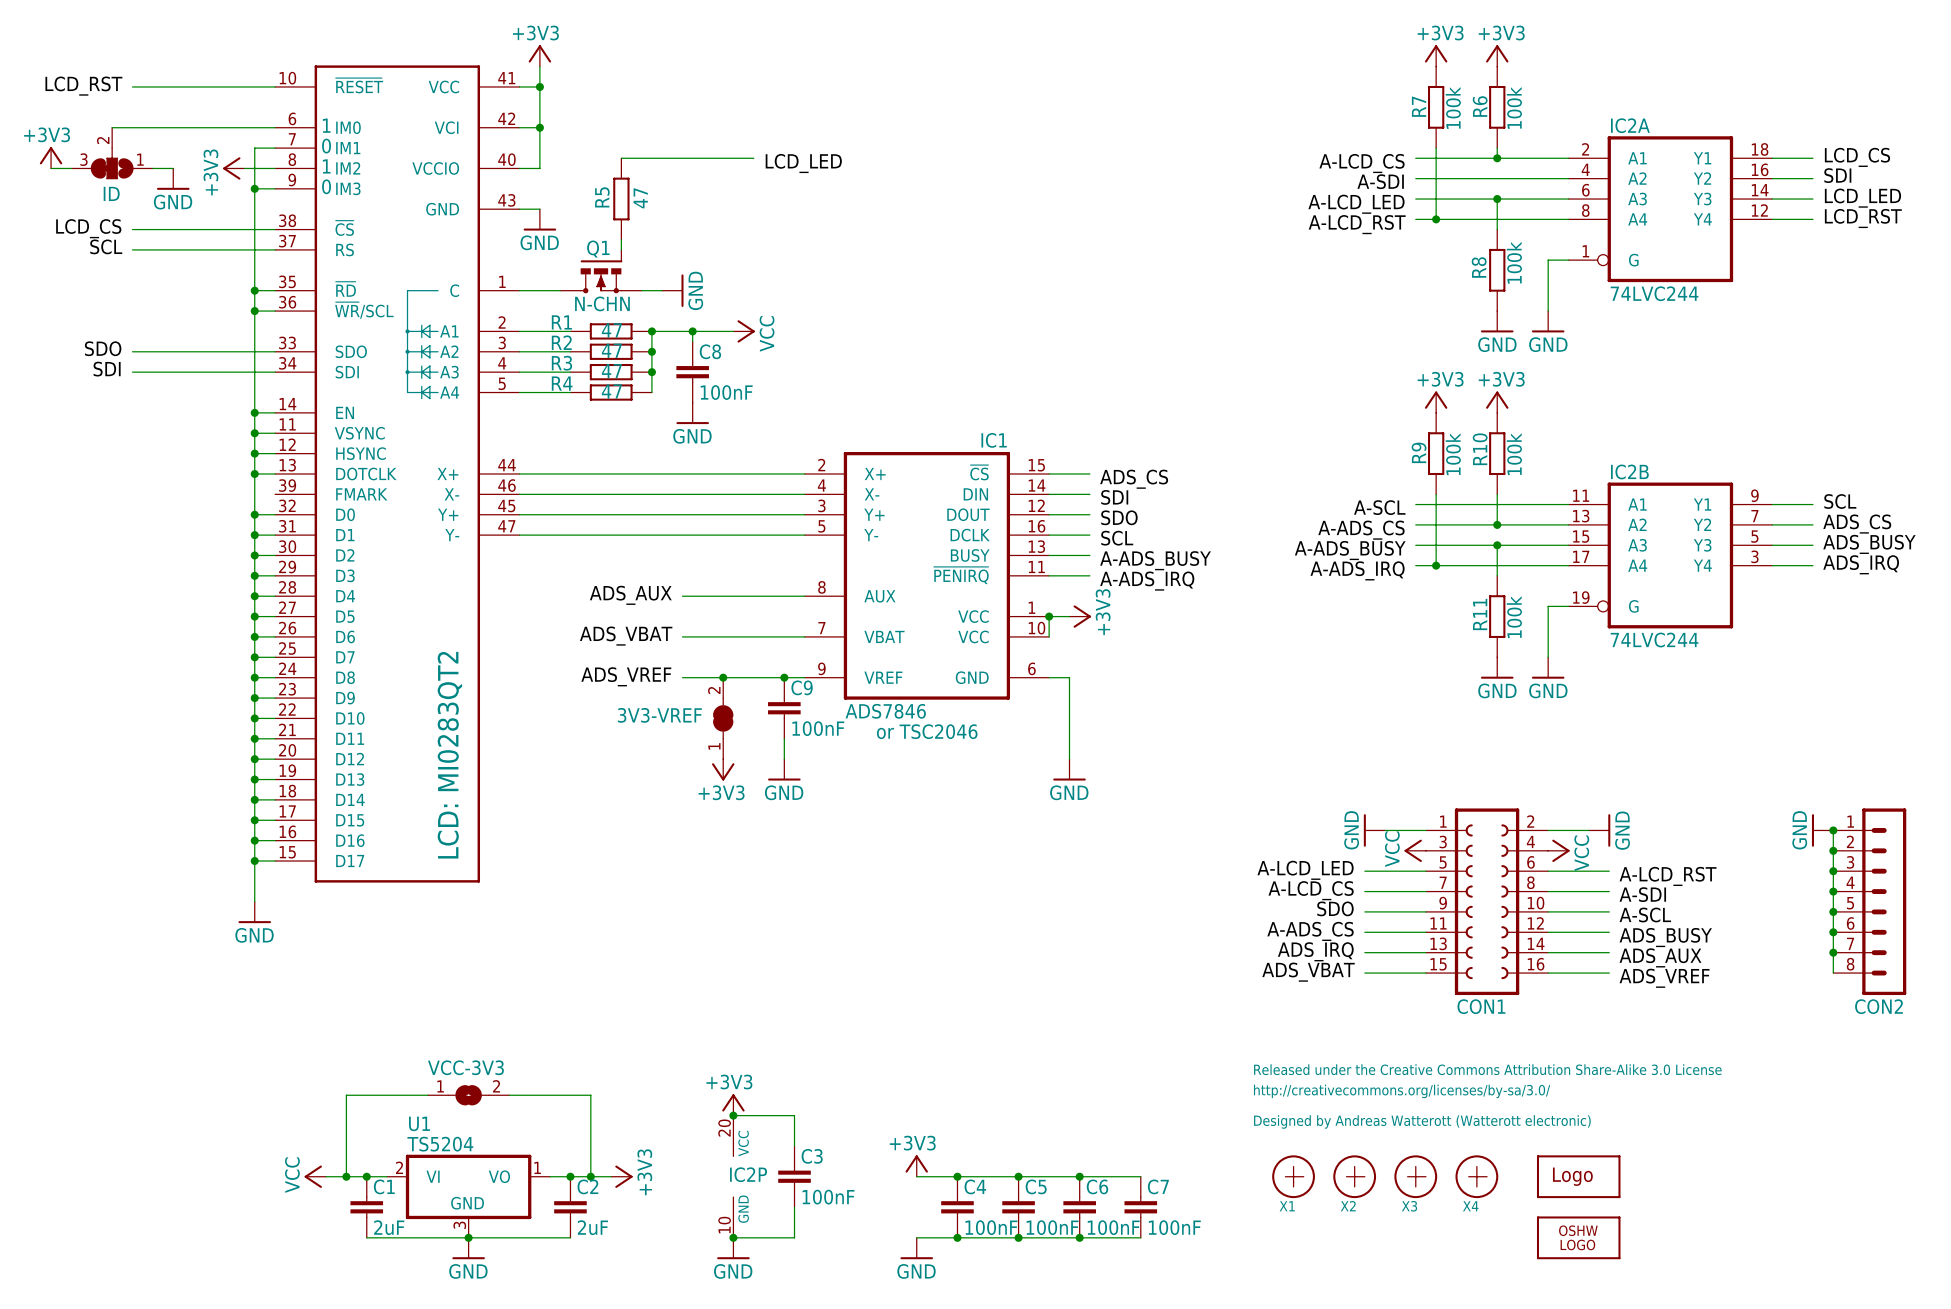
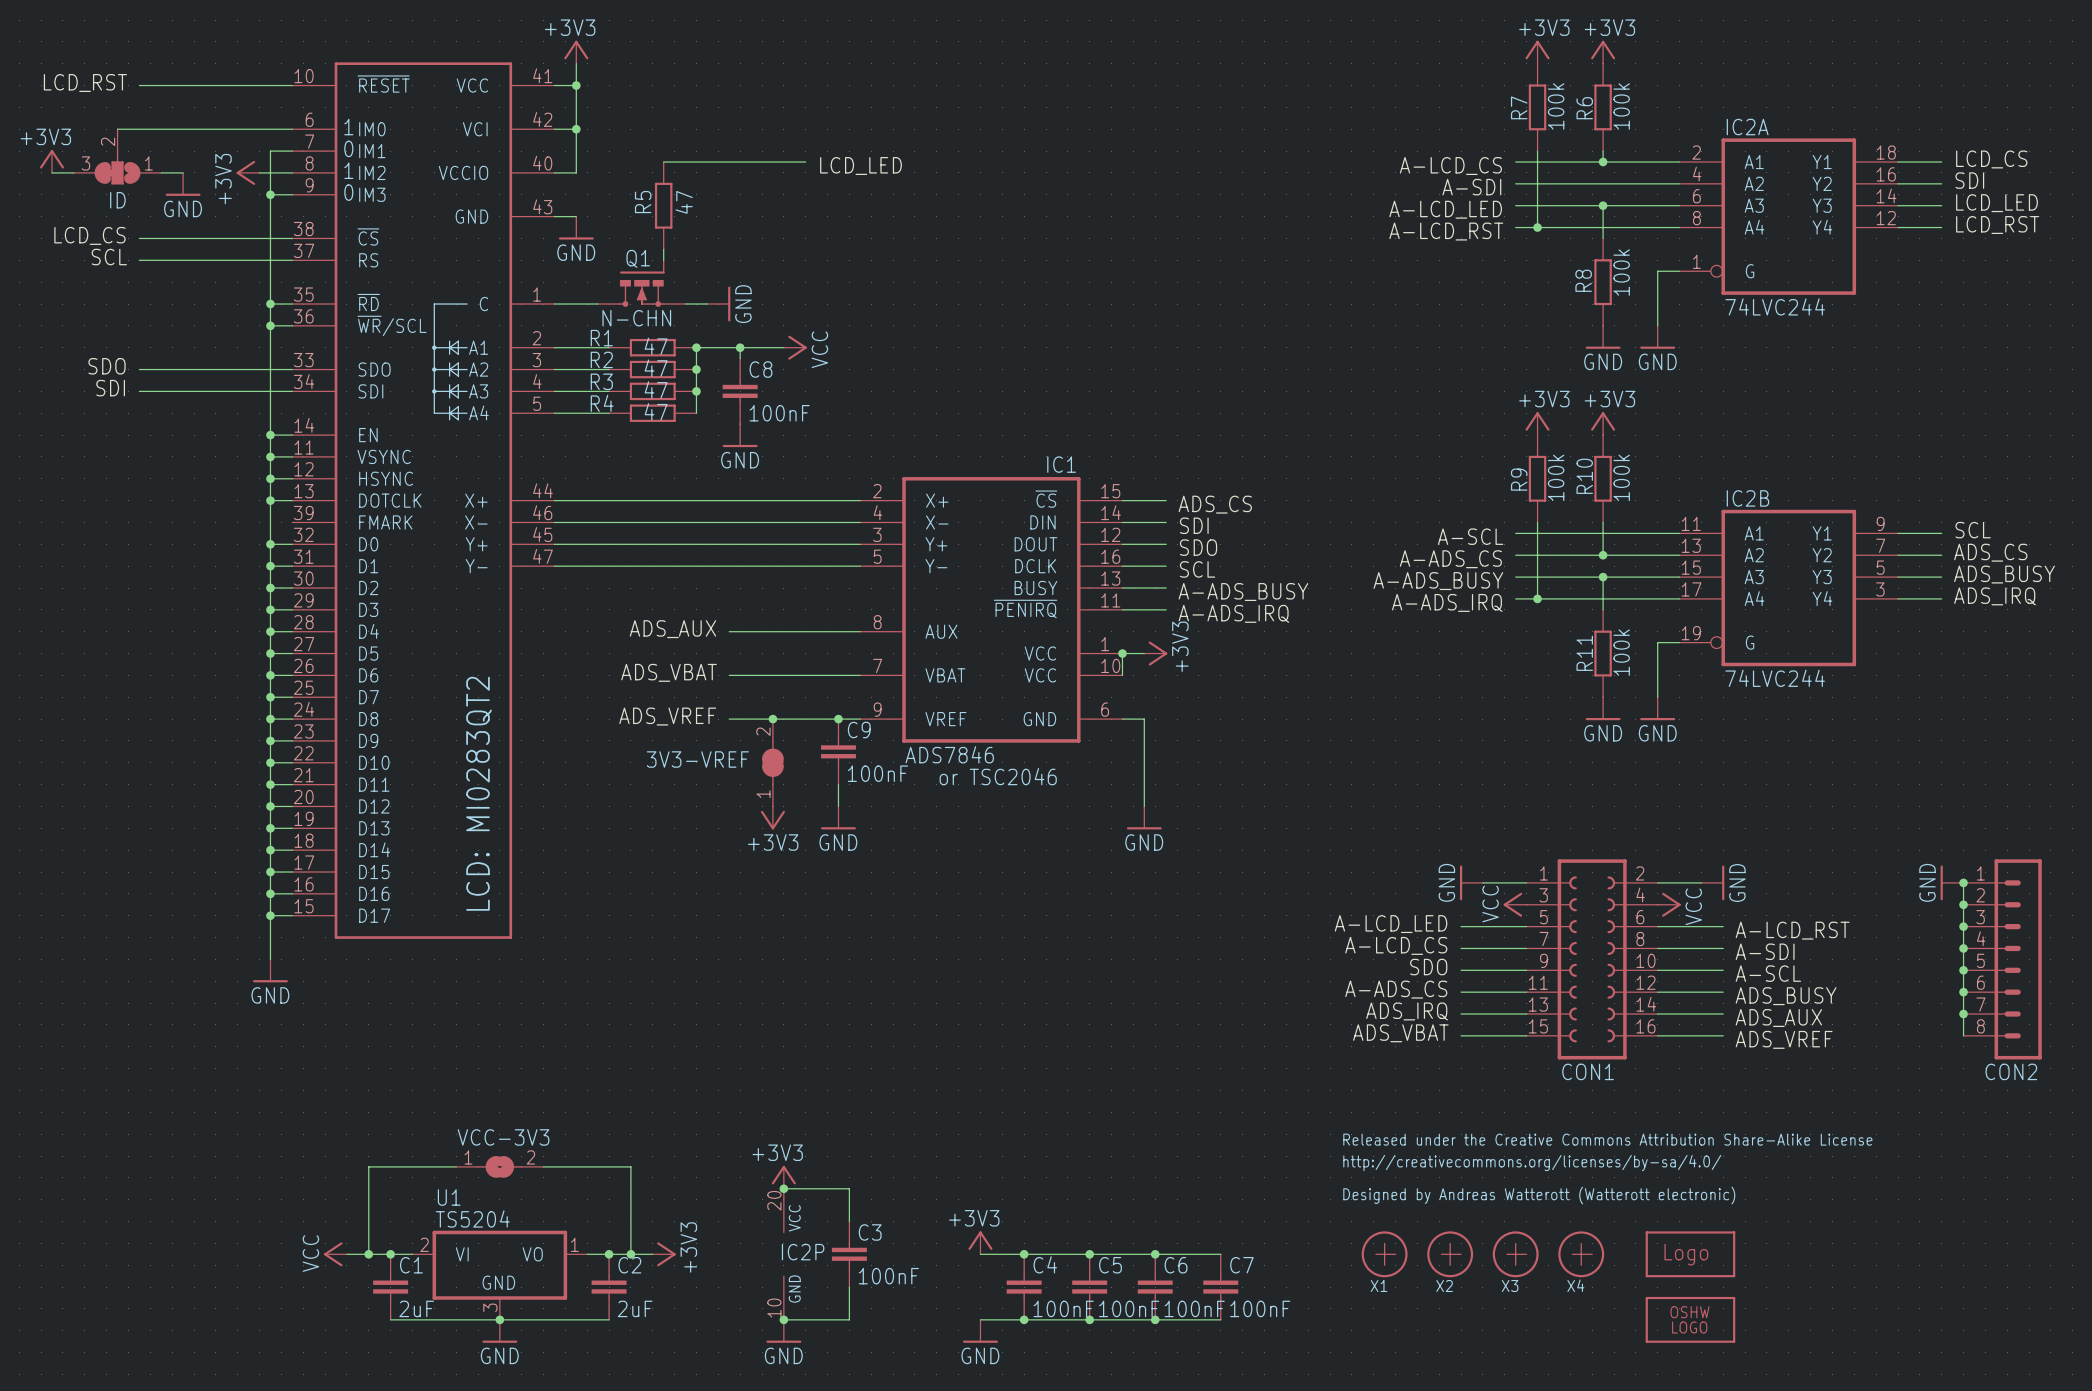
text: Released under the Creative Commons Attribution Share-Alike 3.0 License (1487, 1069) -> Released under the Creative Commons Attribution Share-Alike License (1607, 1139)
text: http://creativecommons.org/licenses/by-sa/3.0/ (1402, 1091) -> http://creativecommons.org/licenses/by-sa/4.0/ (1532, 1163)

